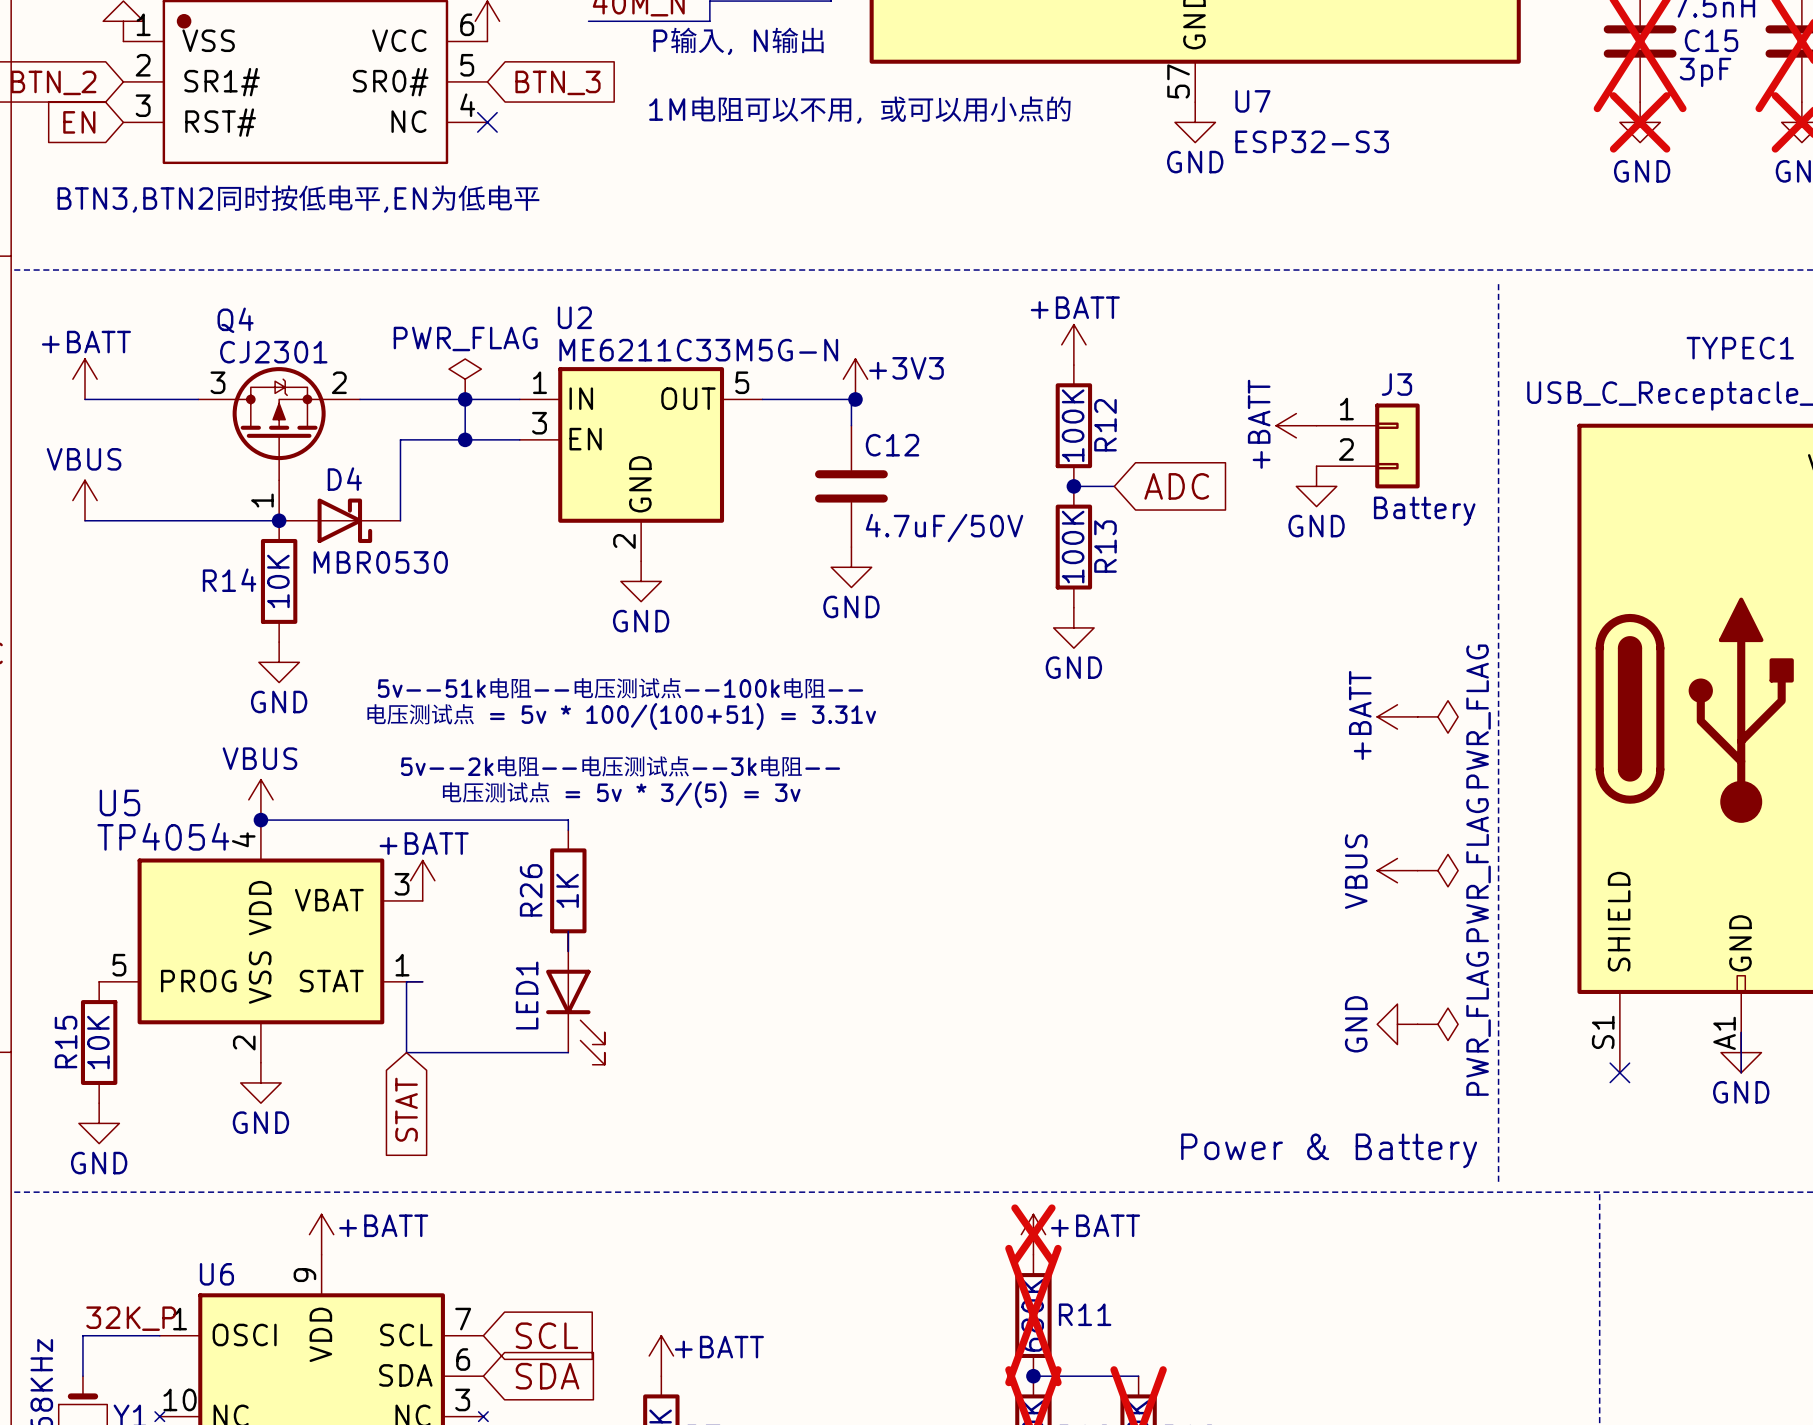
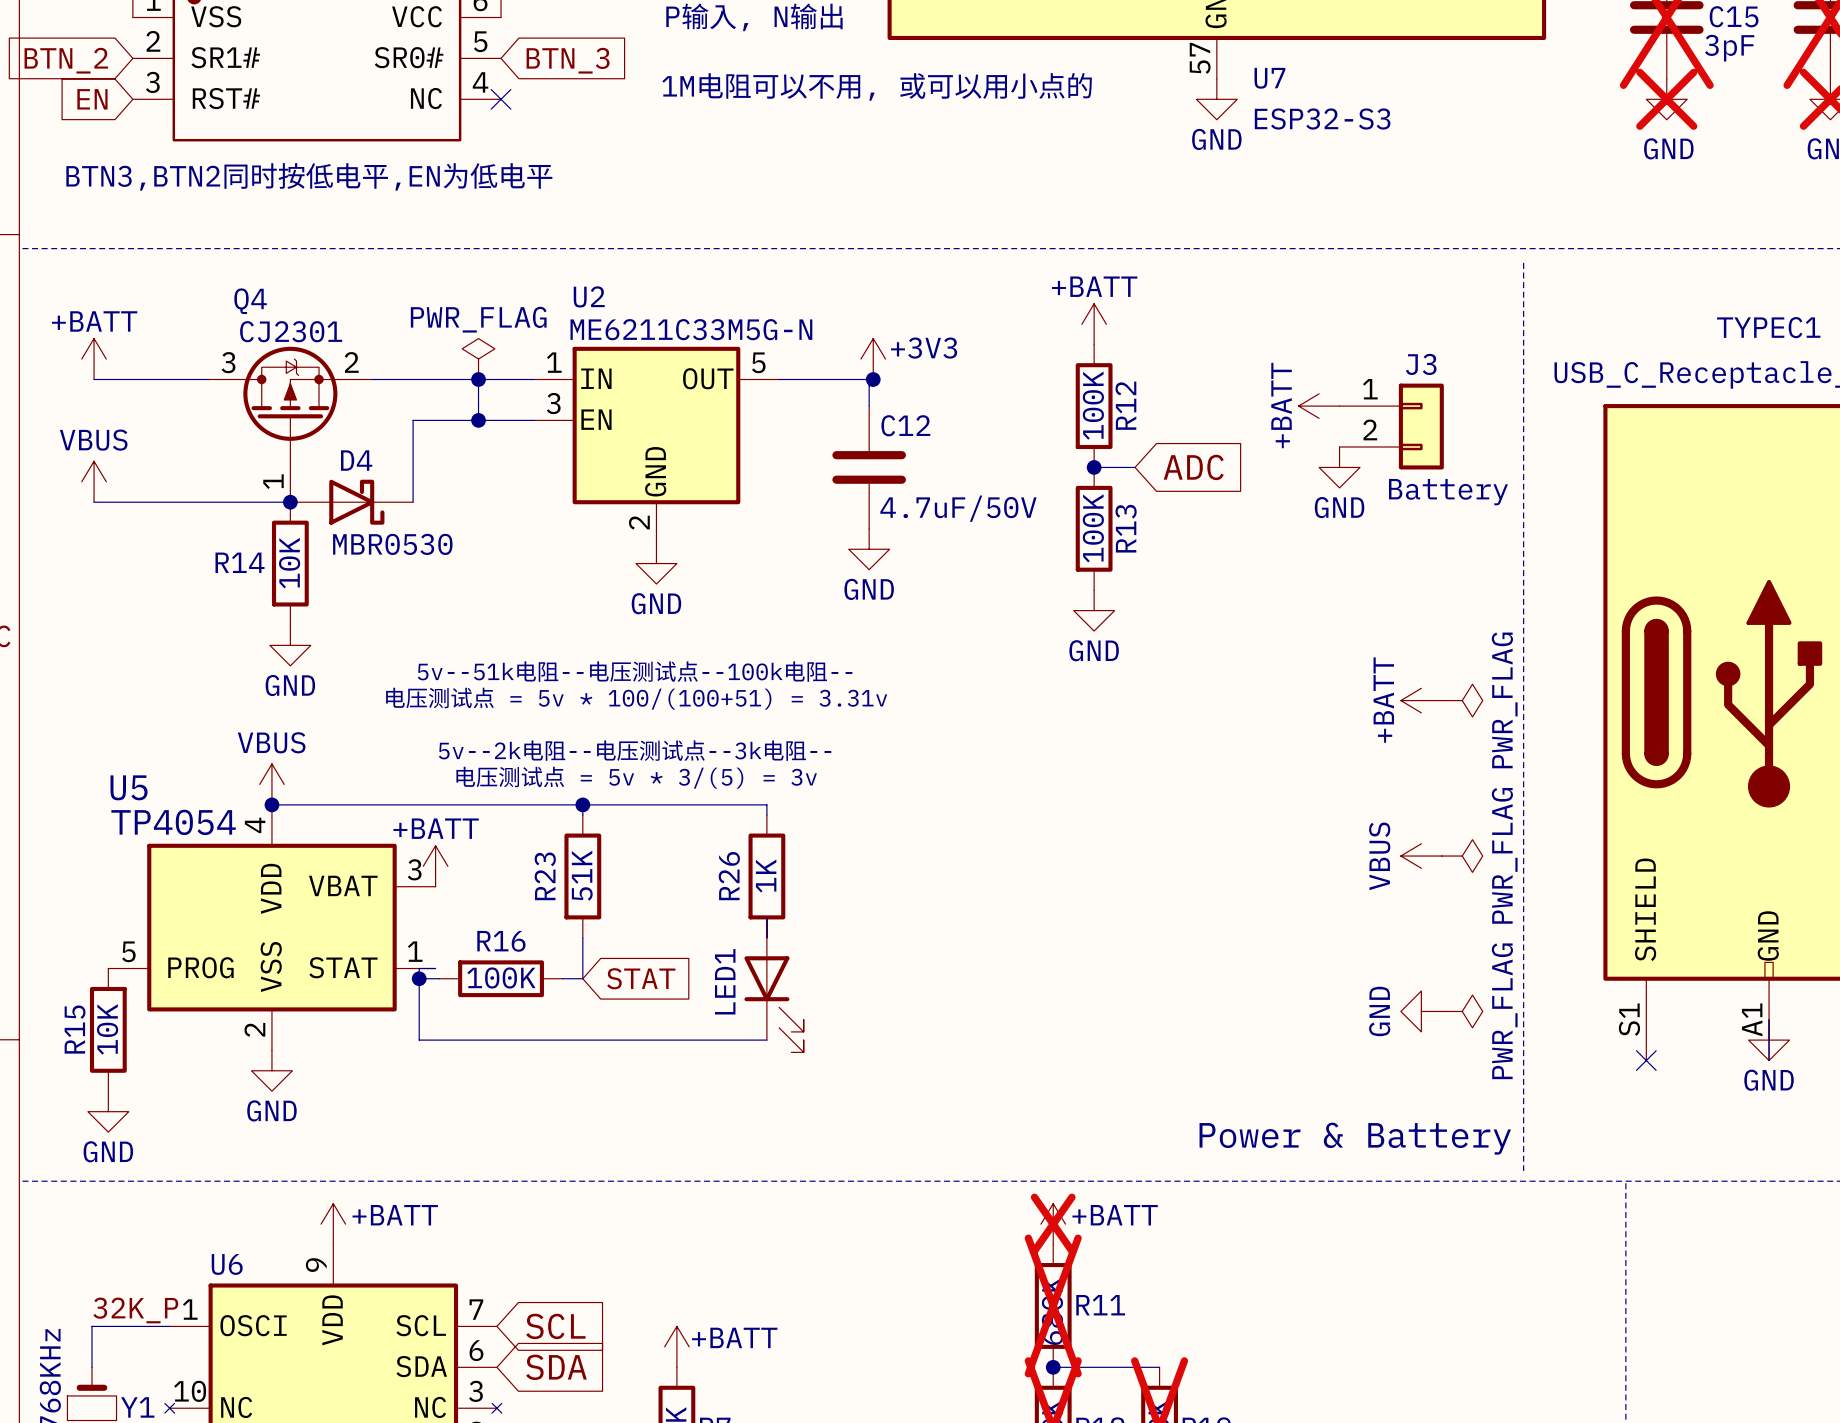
wire: none -> (582, 804) (766, 804) (766, 815)
junction: none -> (582, 804)
R26 name: R26 (531, 890) -> R23 (545, 876)
R26 value: 1K (567, 890) -> 51K (582, 875)
R26: none -> 1K (766, 876)
wire: none -> (766, 917) (766, 937)
wire: none -> (419, 978) (439, 978)
junction: none -> (419, 978)
R16: none -> 100K (501, 978)
LED1 position: (575, 998) -> (774, 984)
wire: none -> (582, 1040) (766, 1040)
global label rotation: 0° (406, 1109) -> 90° counterclockwise (641, 978)
global label position: STAT (406, 1109) -> STAT (641, 978)

